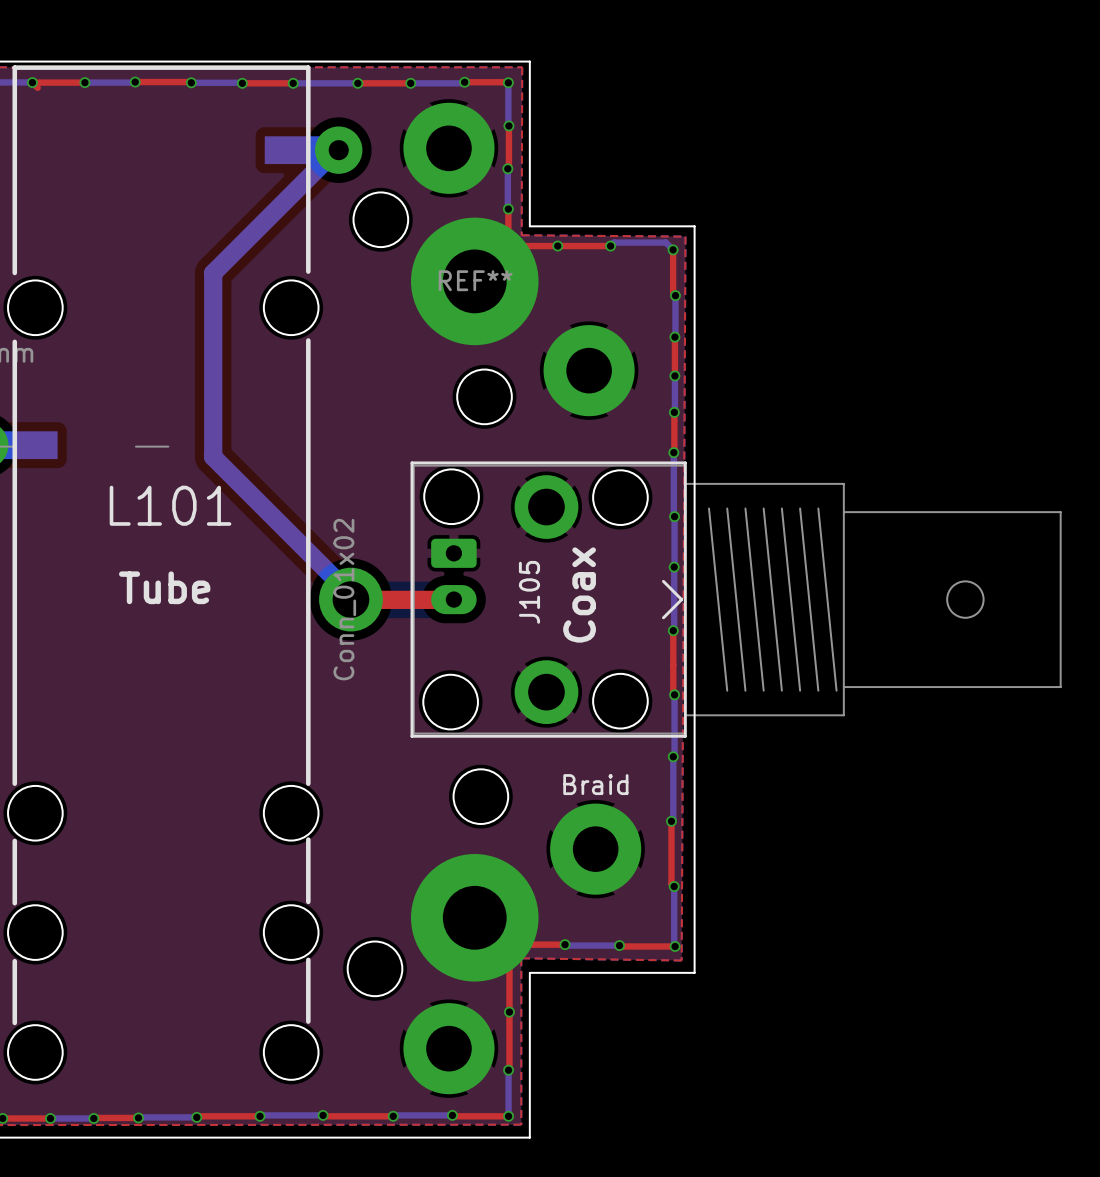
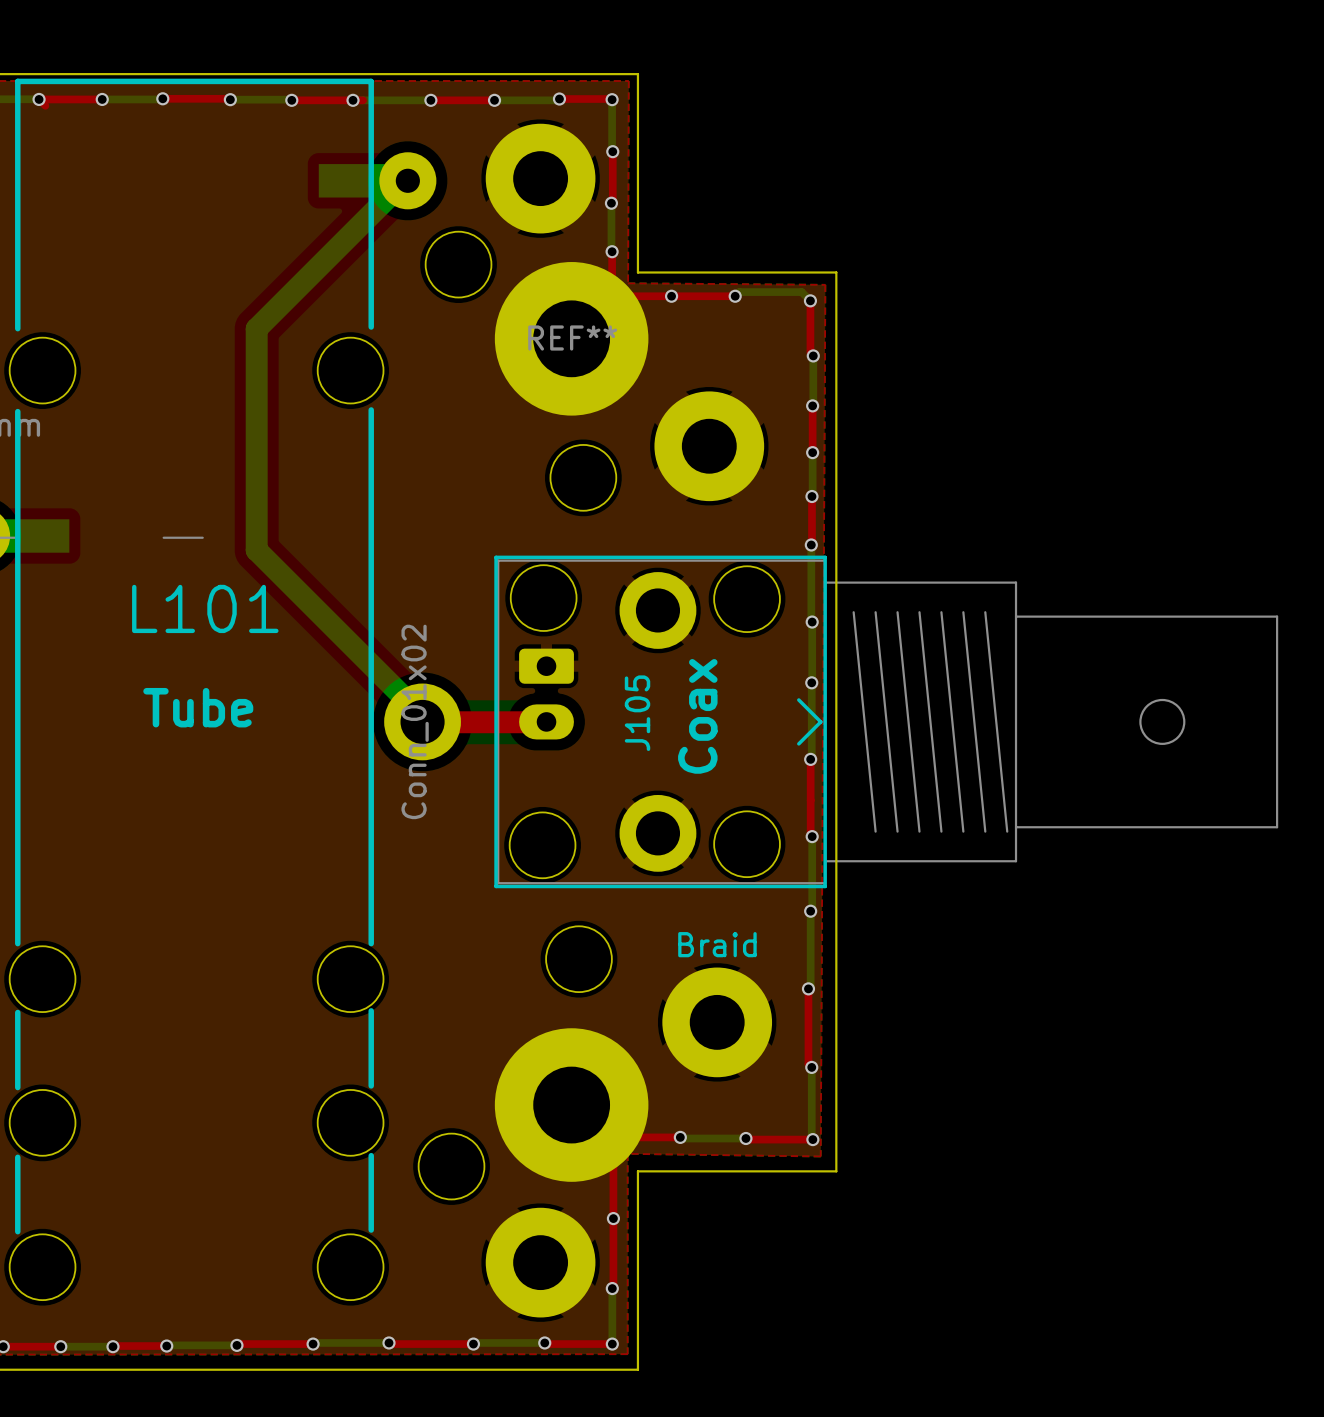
top track: none -> (353, 100) (363, 100)

